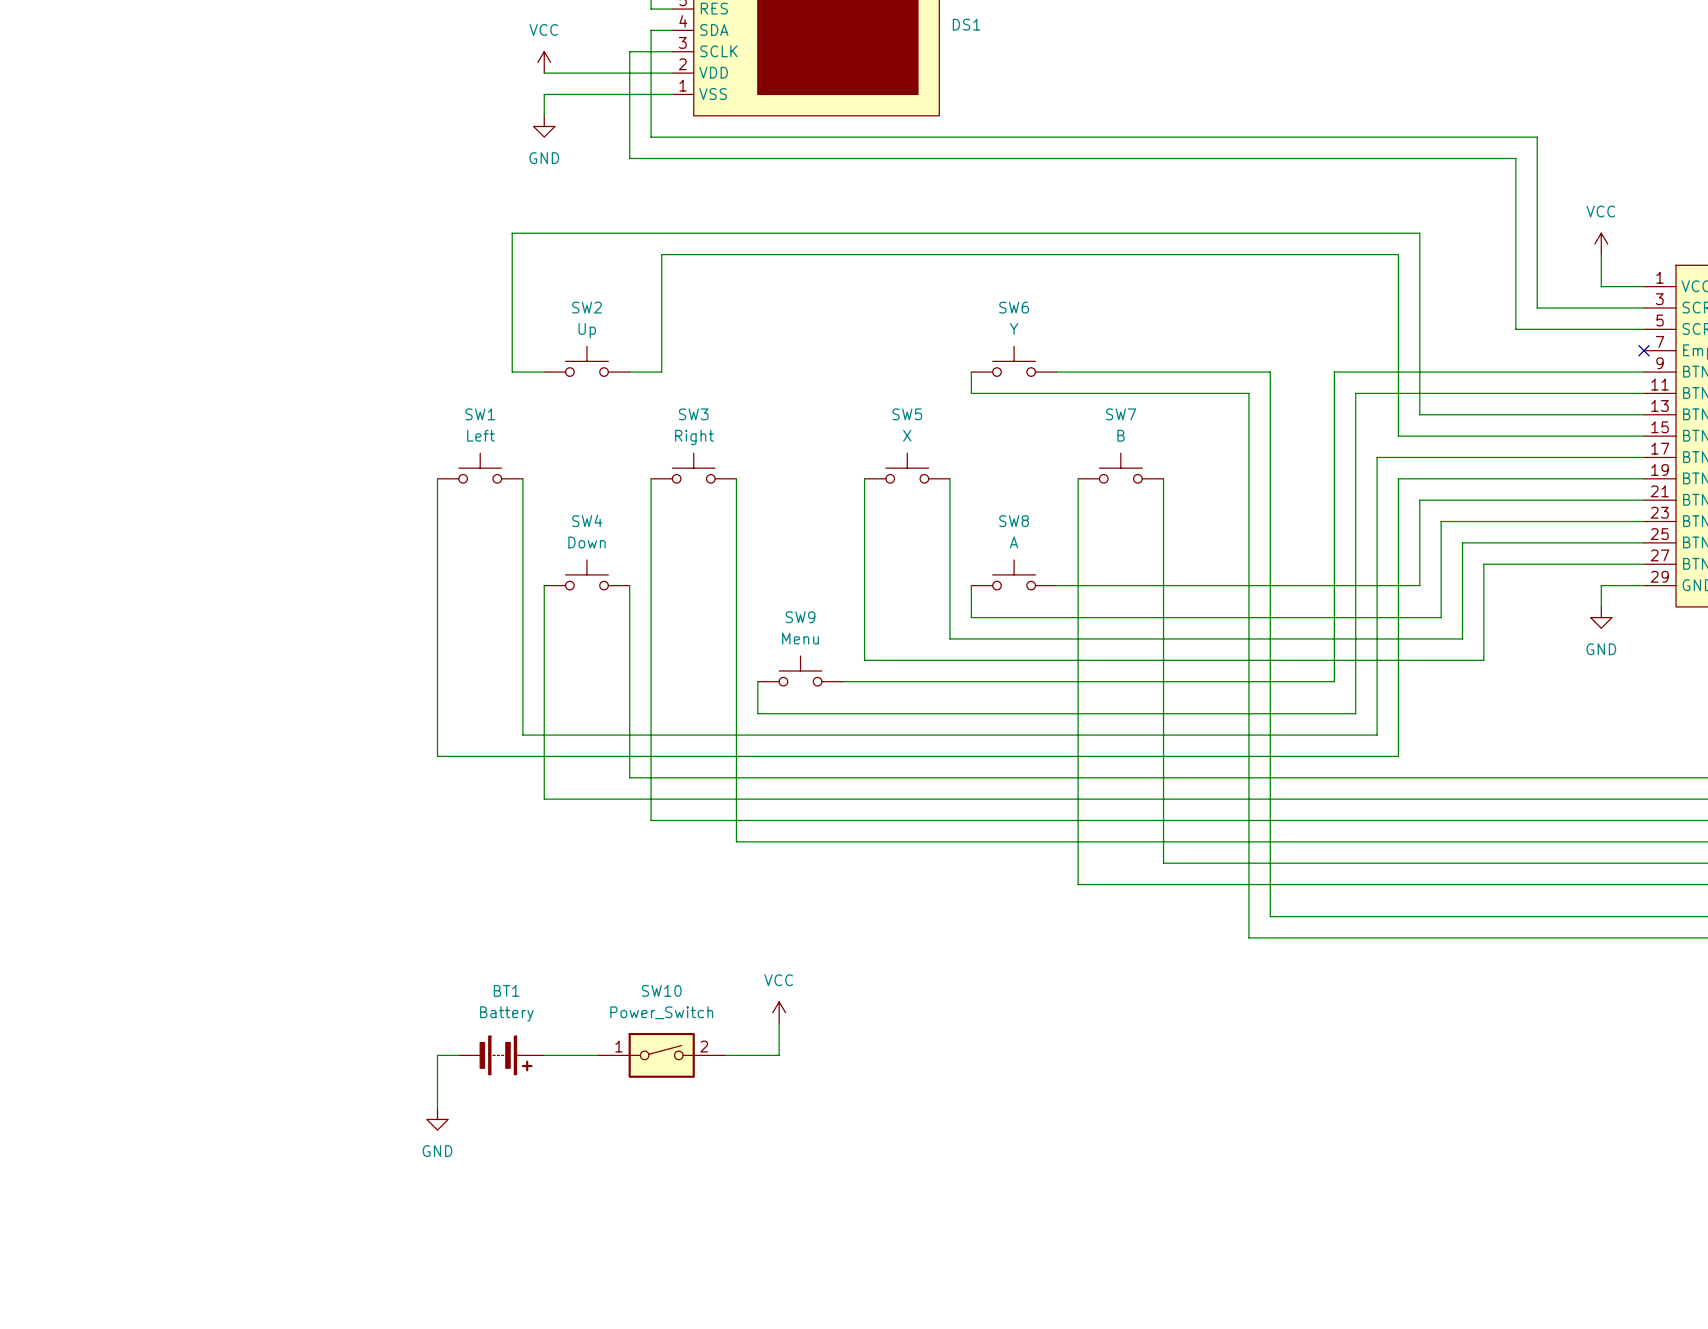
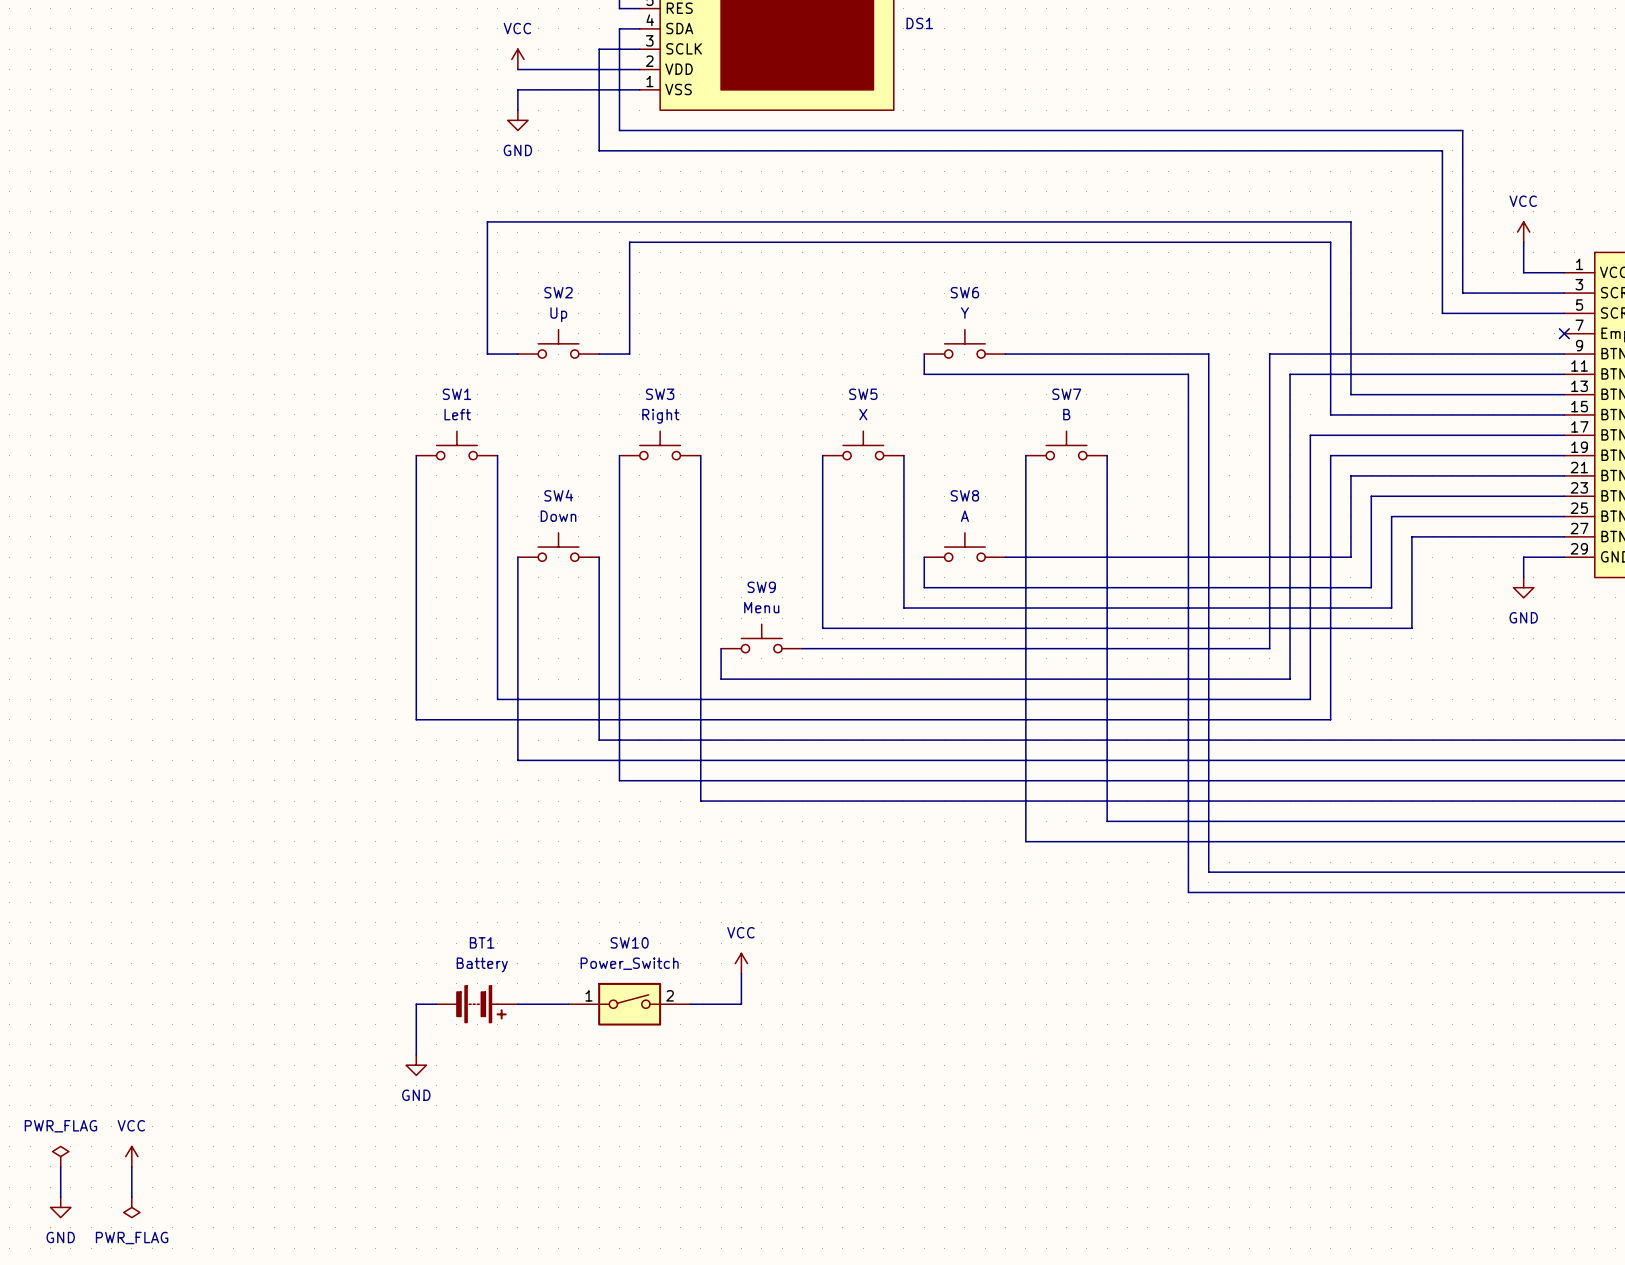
power symbol: none -> PWR_FLAG (60, 1156)
power symbol: none -> VCC (131, 1156)
wire: none -> (60, 1166) (60, 1197)
wire: none -> (131, 1166) (131, 1197)
power symbol: none -> GND (60, 1207)
power symbol: none -> PWR_FLAG (131, 1207)

